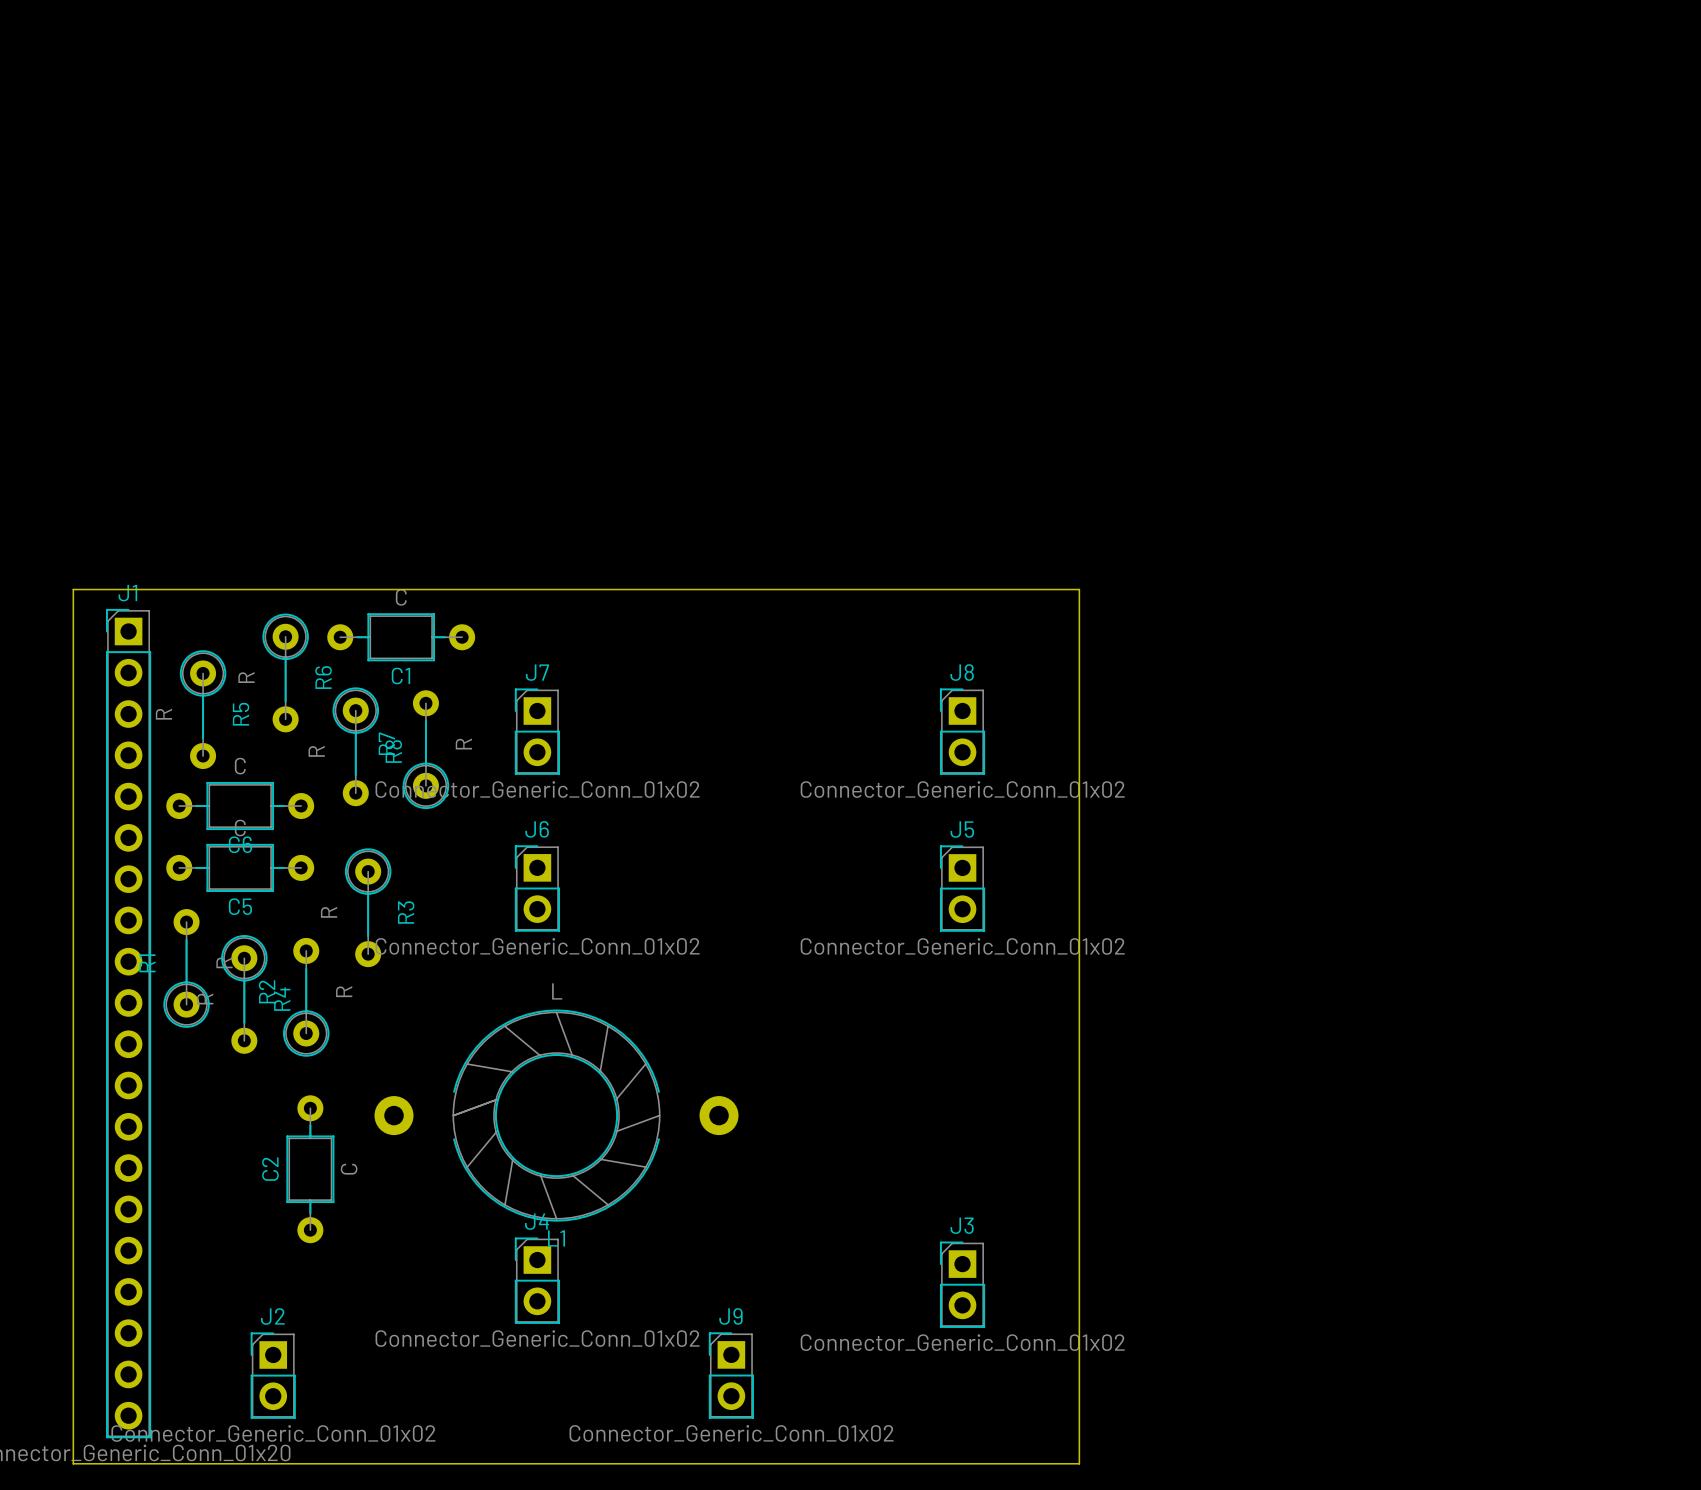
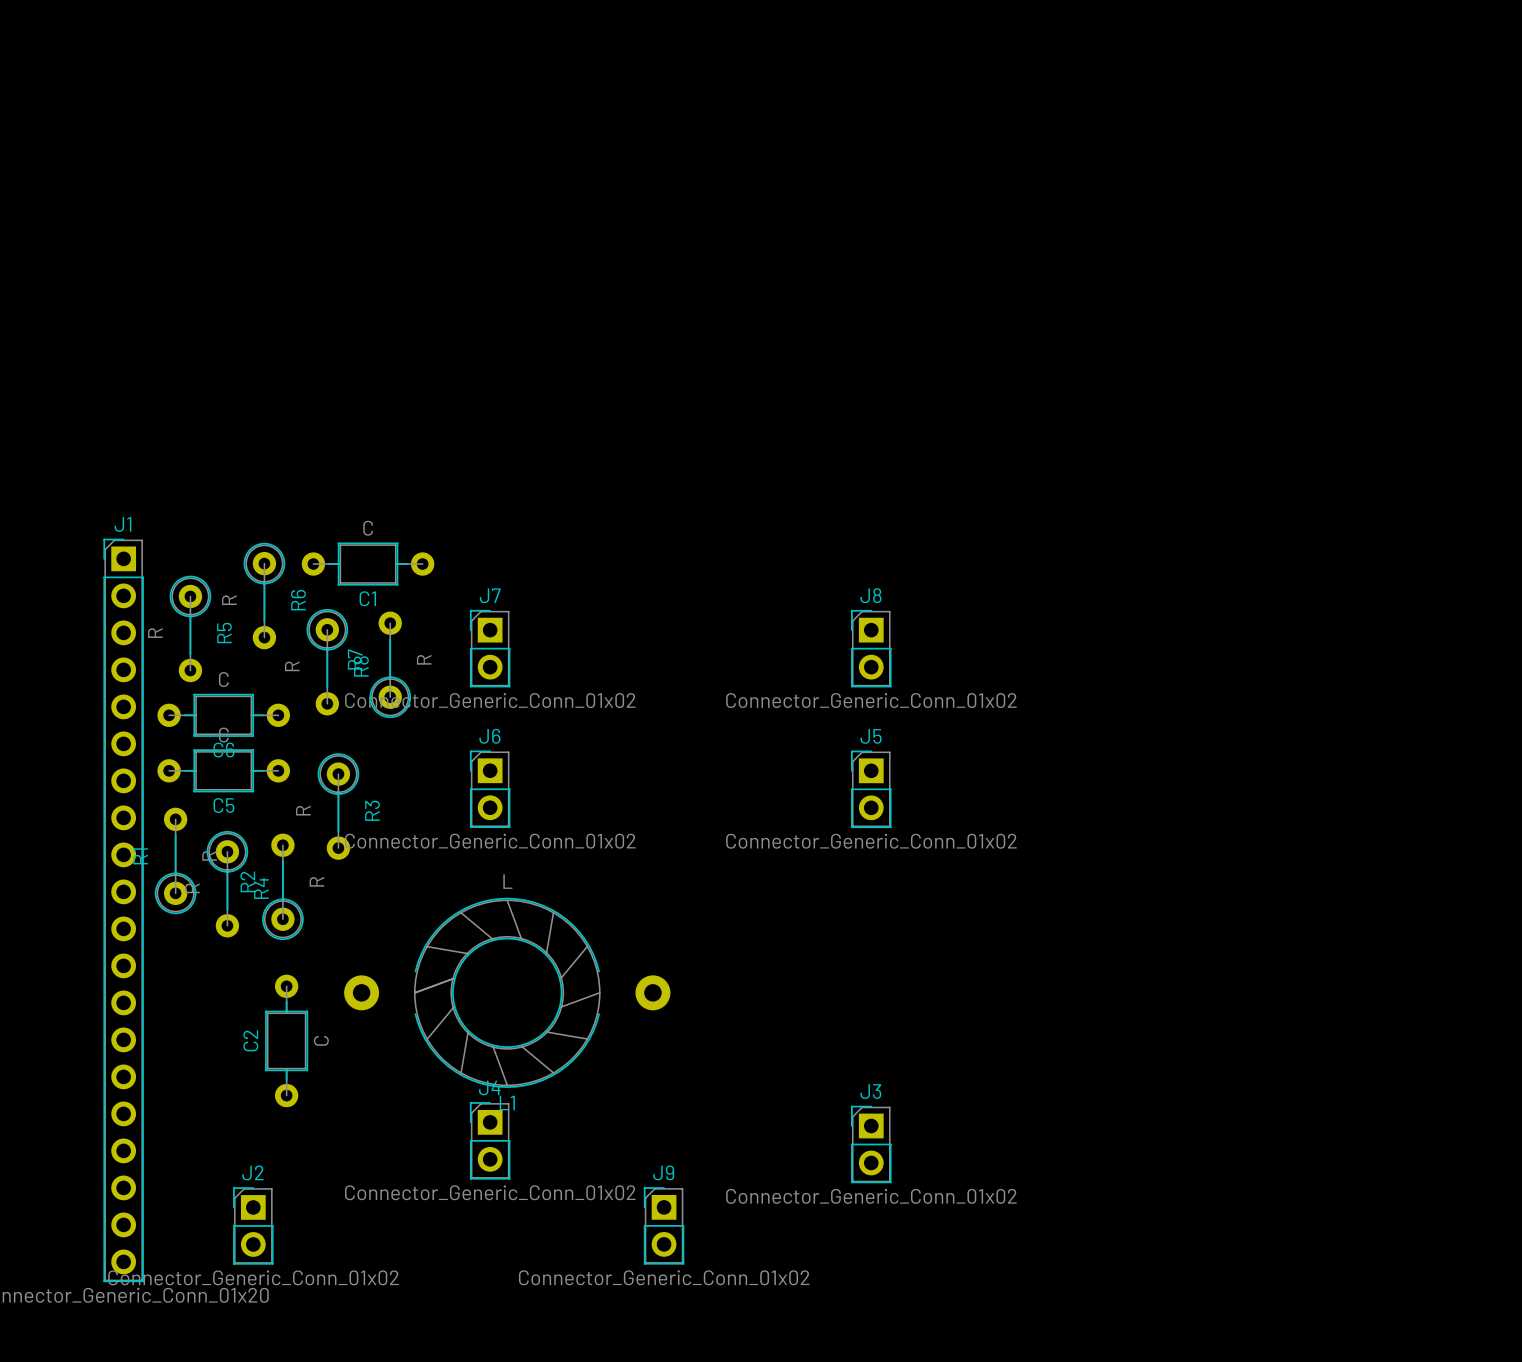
board edge: (73, 589) (1079, 589) (1079, 1463) (73, 1463) (73, 589) -> none

